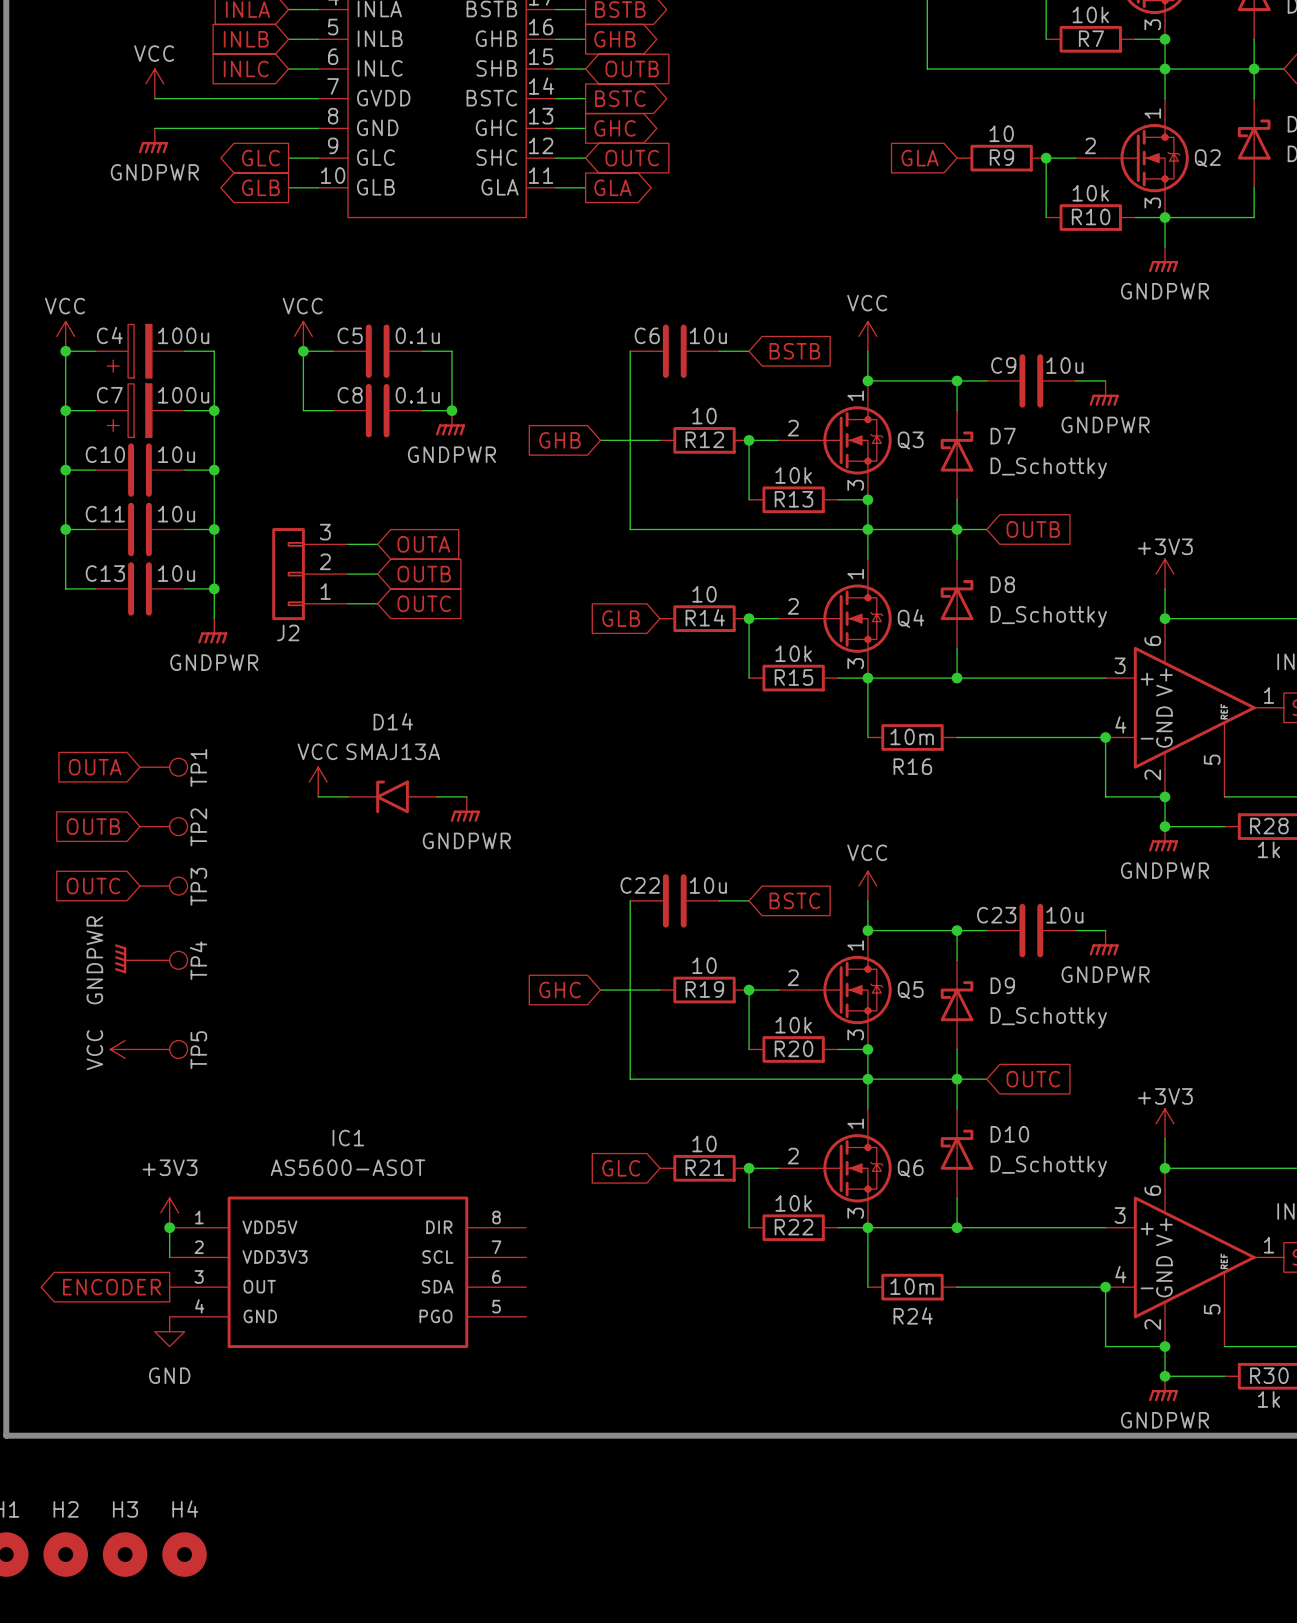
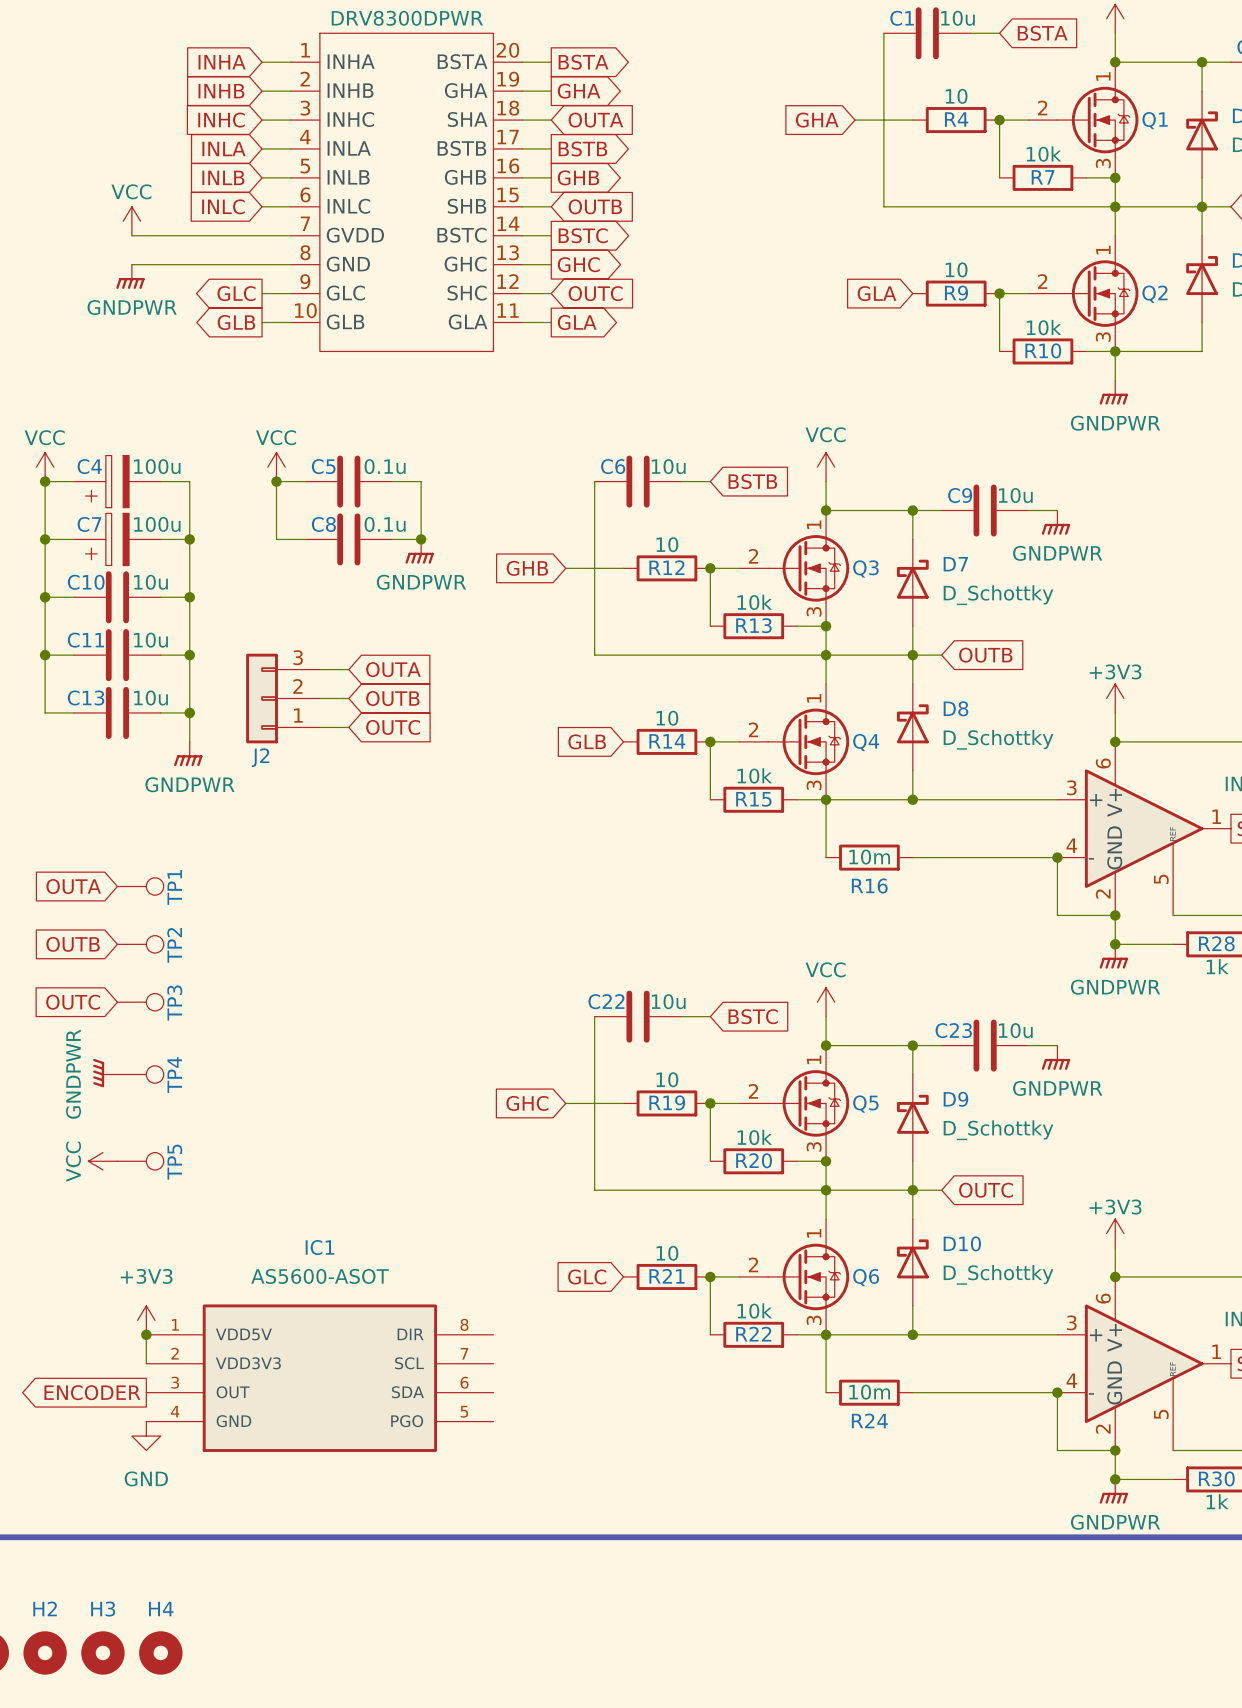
power symbol: VCC (318, 782) -> none
wire: (318, 796) (347, 796) -> none
D14: SMAJ13A (392, 796) -> none
wire: (437, 796) (466, 796) -> none
power symbol: GNDPWR (465, 809) -> none

